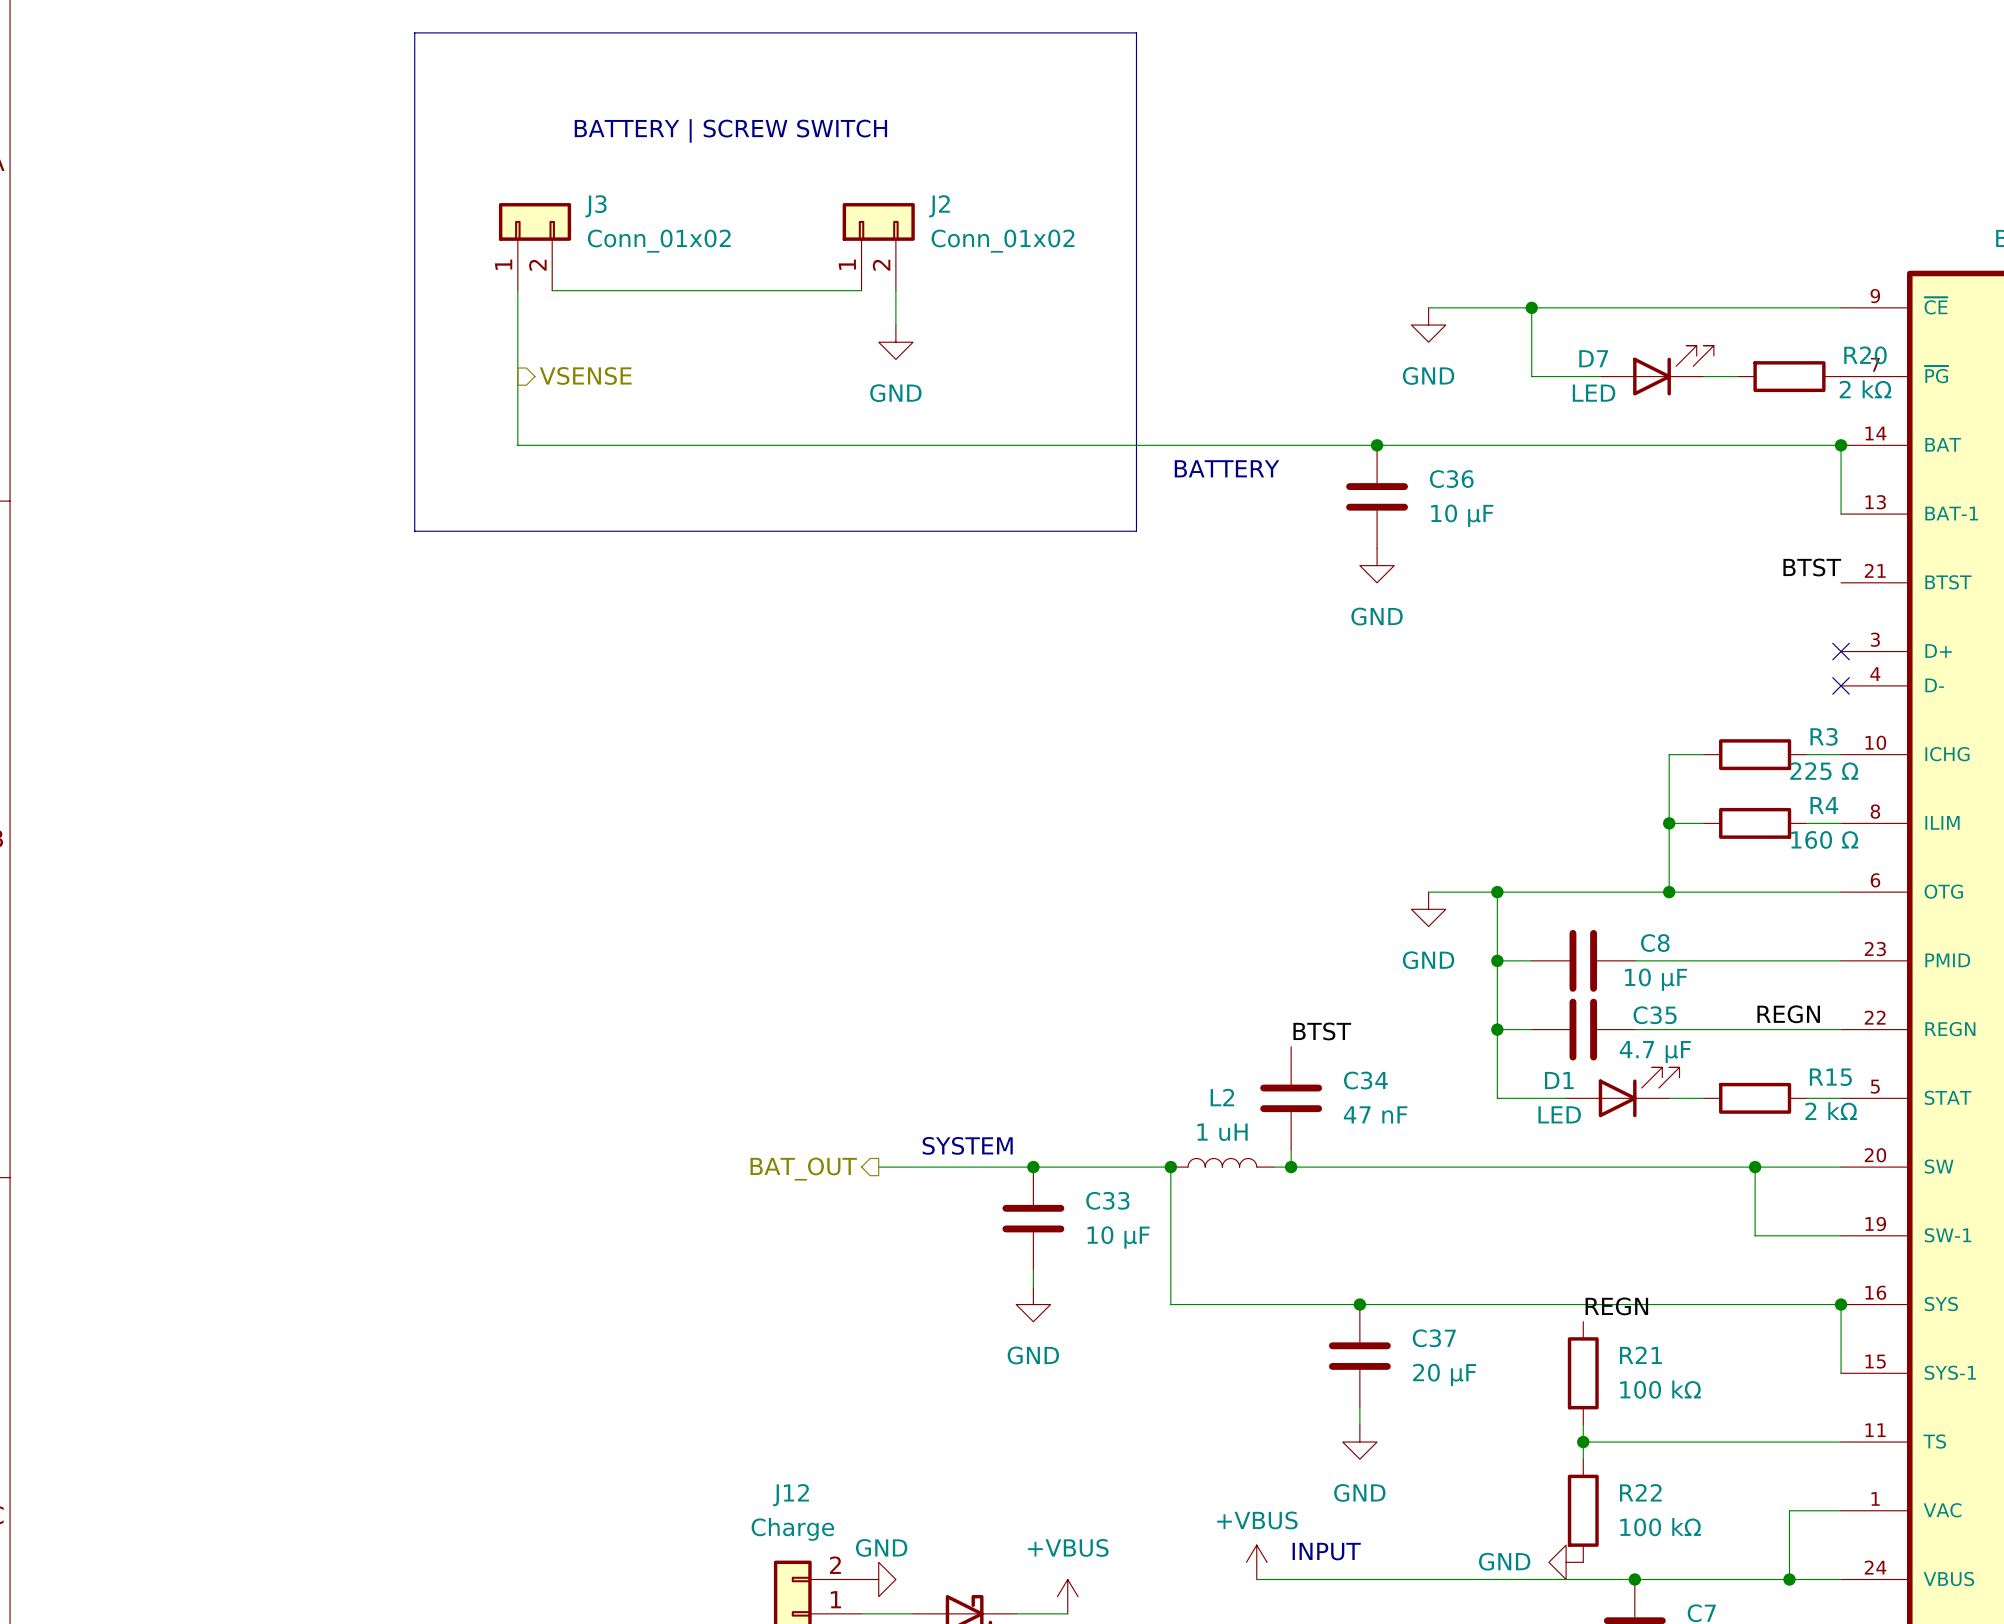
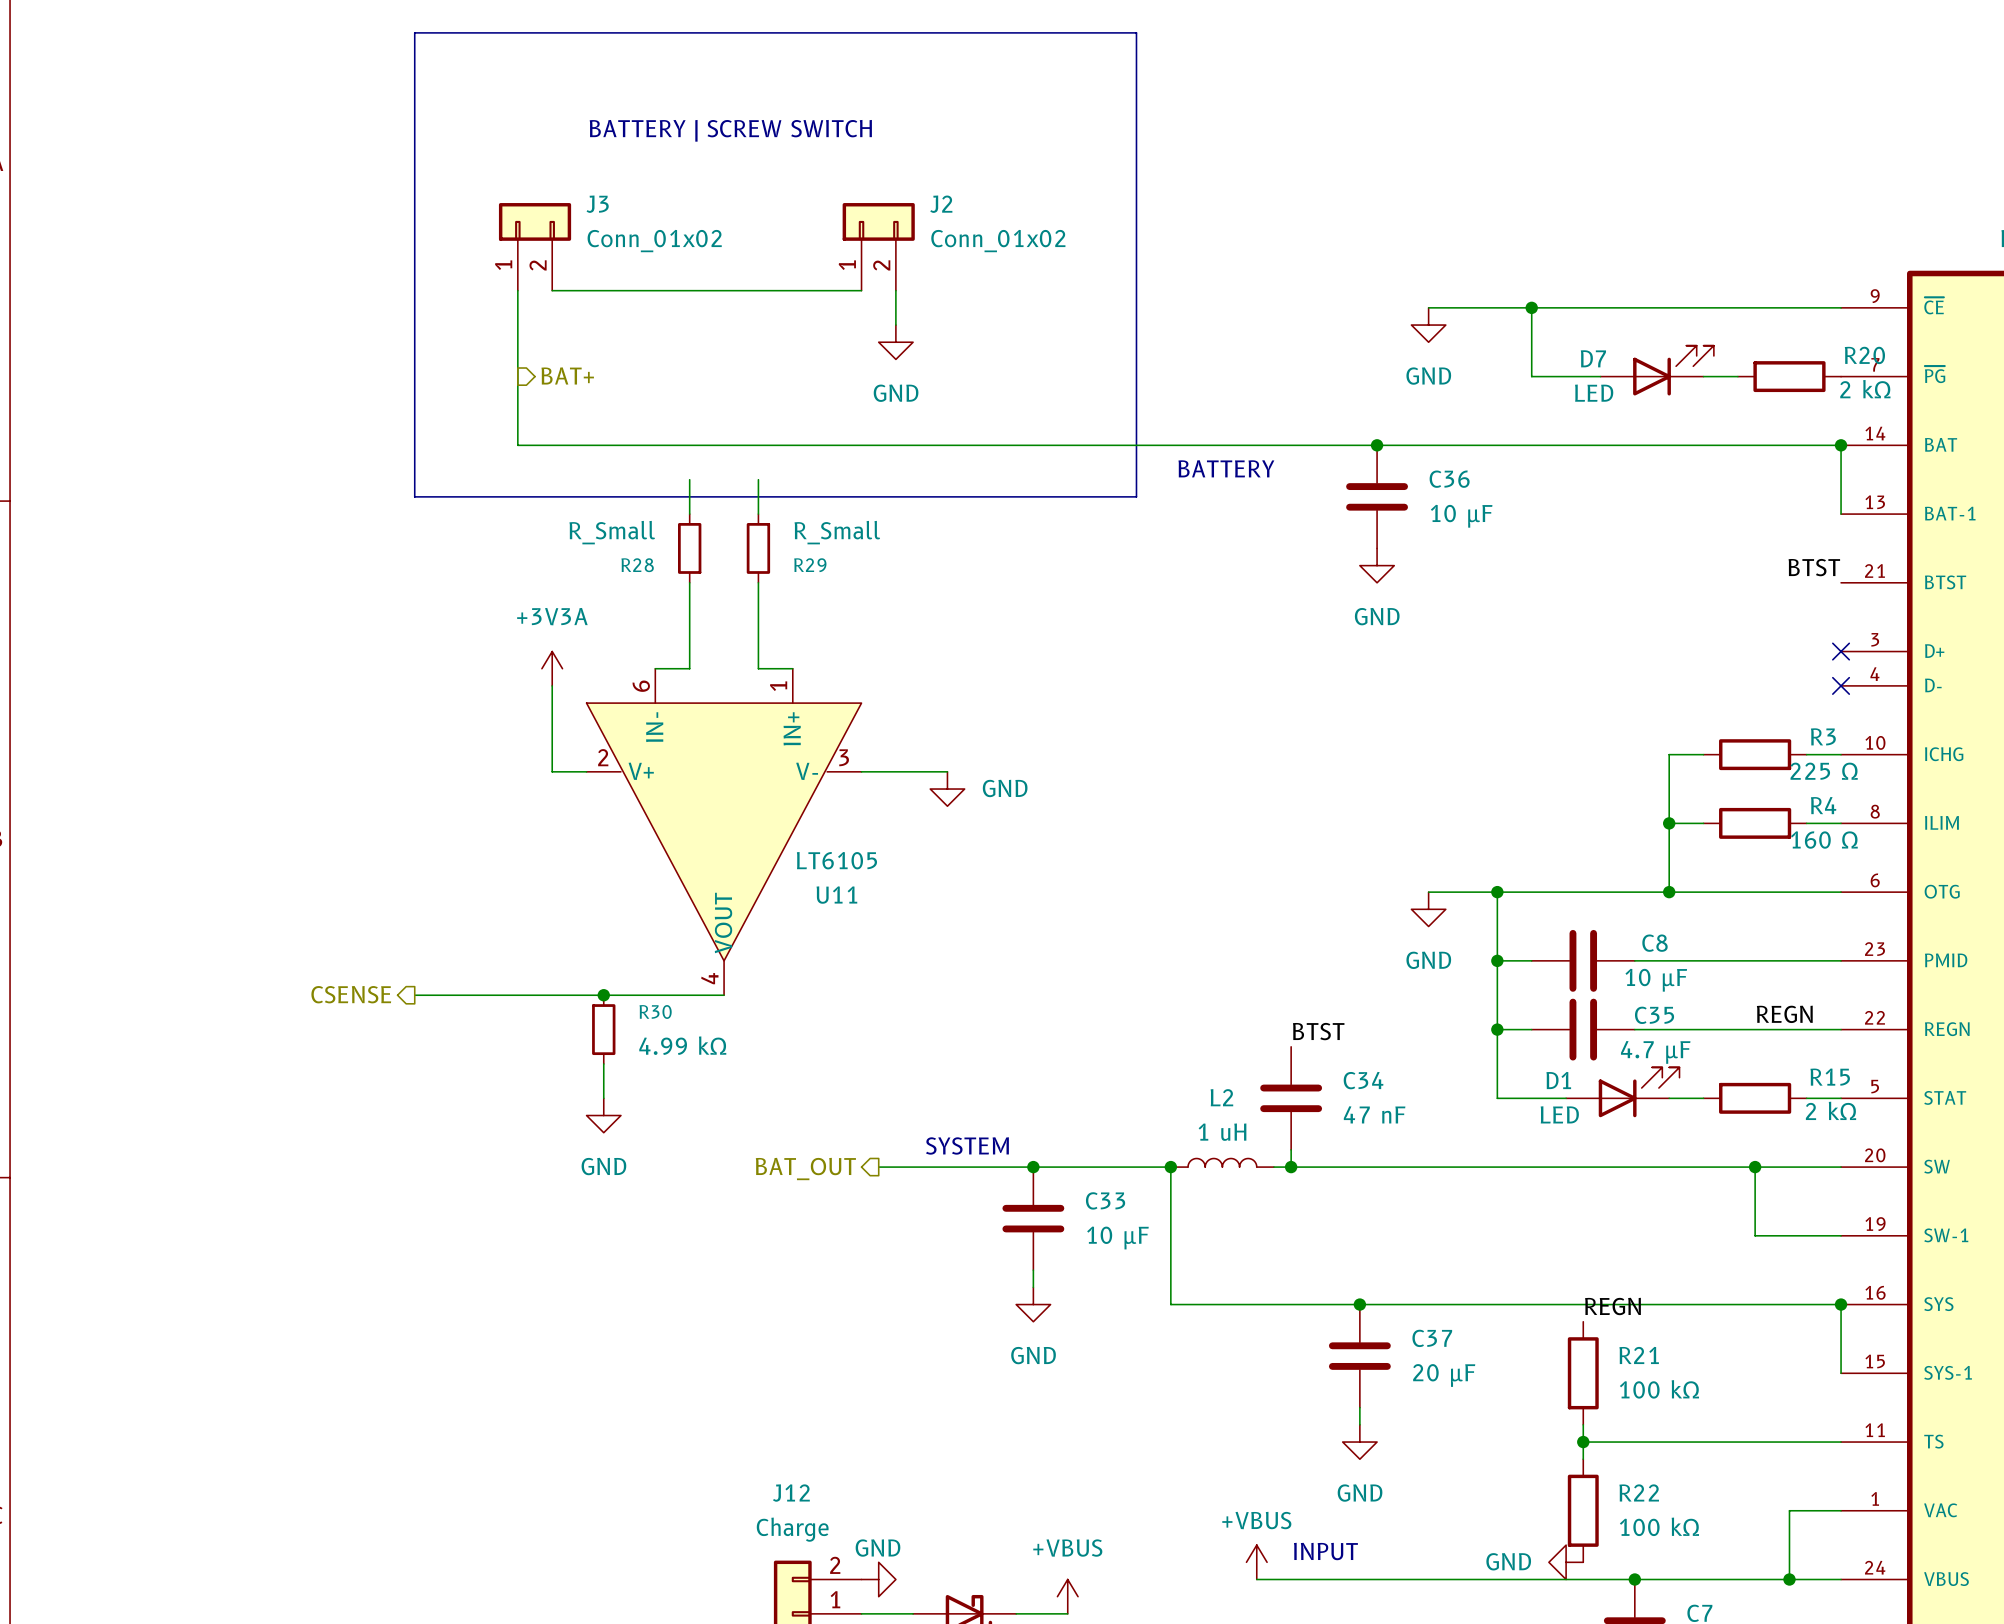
hierarchical label: VSENSE (585, 375) -> BAT+ (567, 375)
wire: none -> (689, 479) (689, 514)
wire: none -> (758, 479) (758, 514)
line: (414, 496) (414, 531) (1136, 531) (1136, 496) -> (414, 496) (1136, 496)
R28: none -> R_Small (689, 548)
R29: none -> R_Small (758, 548)
wire: none -> (689, 582) (689, 668) (655, 668)
wire: none -> (758, 582) (758, 668) (792, 668)
power symbol: none -> +3V3A (552, 668)
wire: none -> (552, 685) (552, 771) (586, 771)
wire: none -> (861, 771) (947, 771)
power symbol: none -> GND (947, 789)
U11: none -> LT6105 (724, 831)
hierarchical label: none -> CSENSE (351, 994)
wire: none -> (414, 995) (724, 995)
junction: none -> (603, 995)
R30: none -> 4.99 kΩ (603, 1029)
wire: none -> (603, 1063) (603, 1098)
power symbol: none -> GND (603, 1115)

